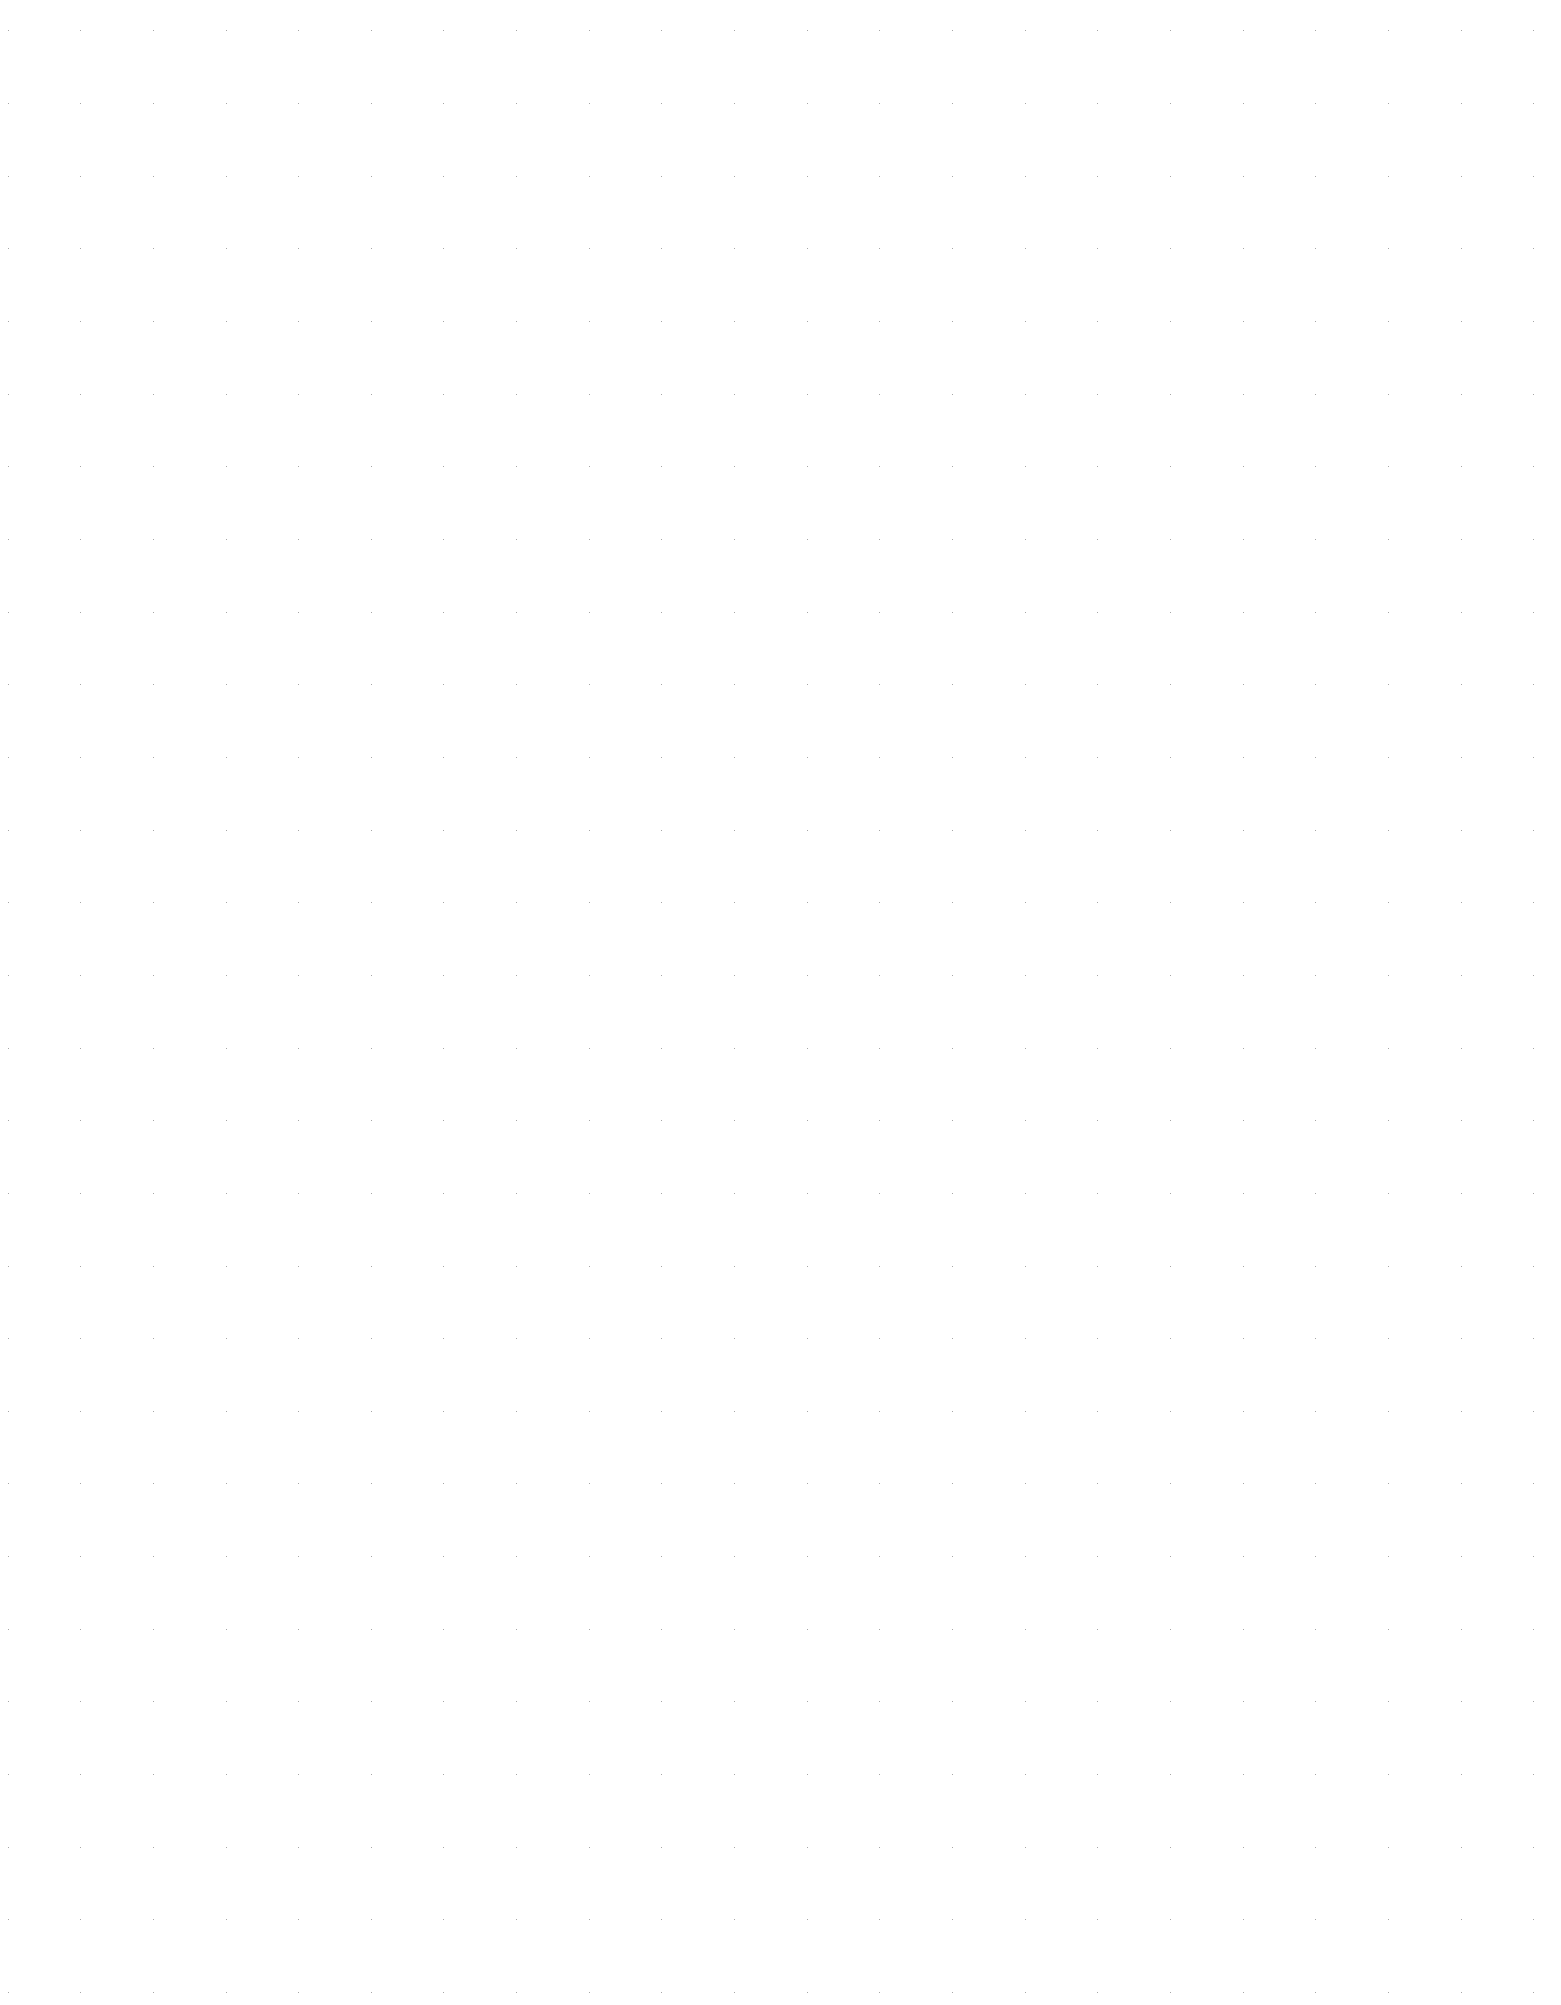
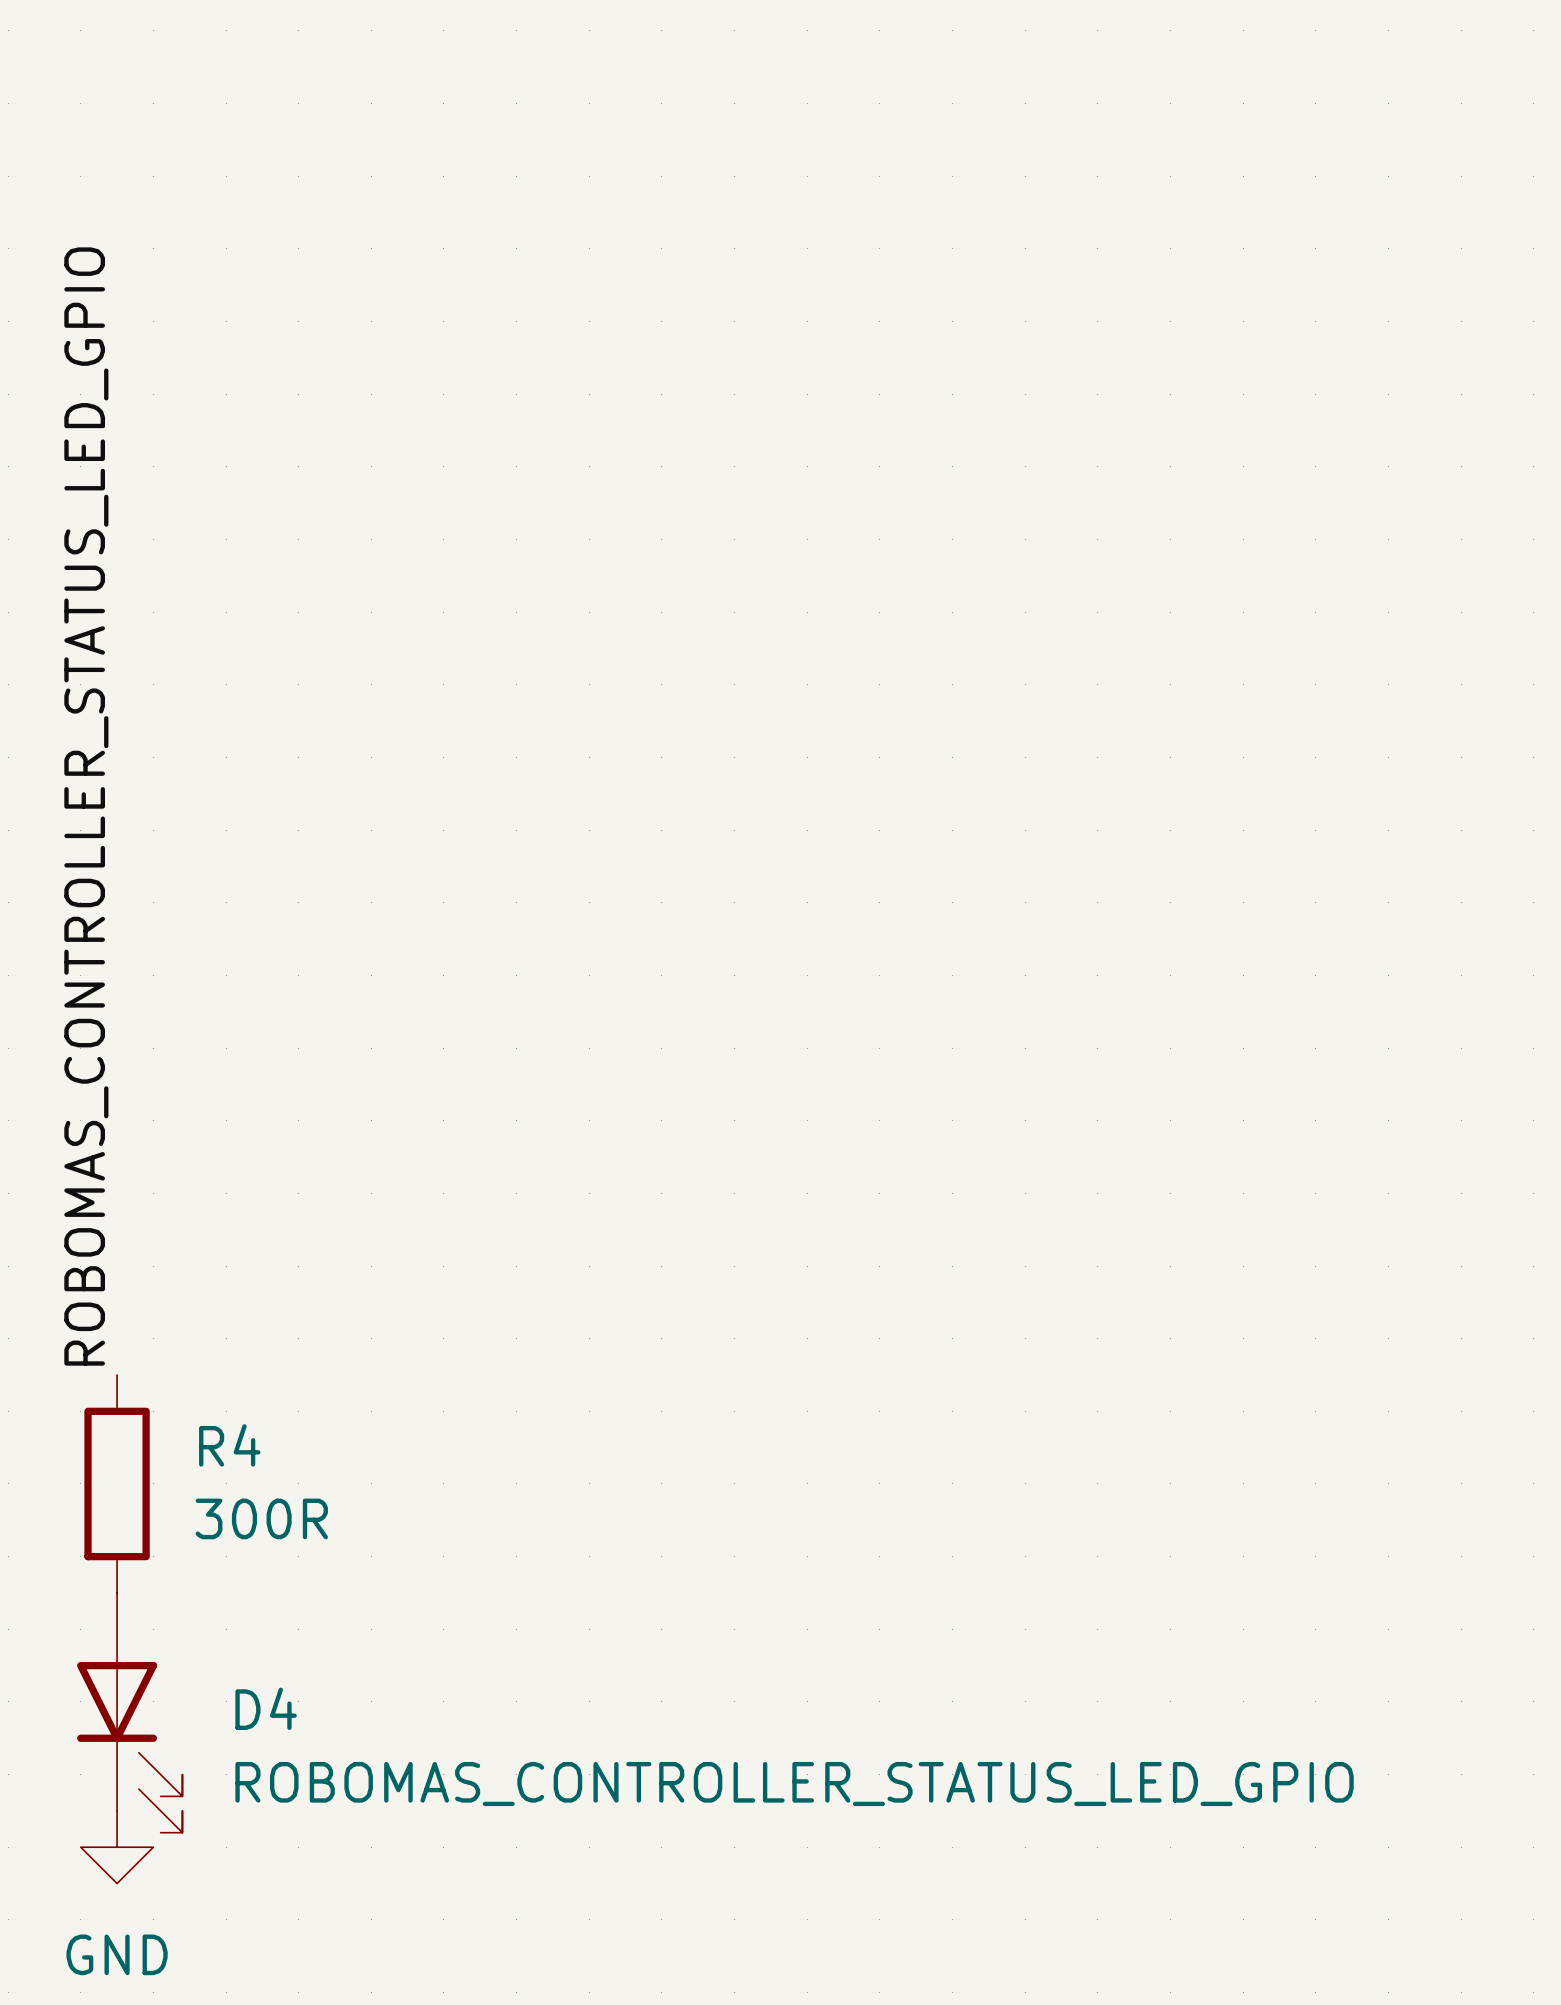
label: none -> ROBOMAS_CONTROLLER_STATUS_LED_GPIO (86, 806)
R4: none -> 300R (117, 1483)
D4: none -> ROBOMAS_CONTROLLER_STATUS_LED_GPIO (129, 1712)
power symbol: none -> GND (117, 1847)

